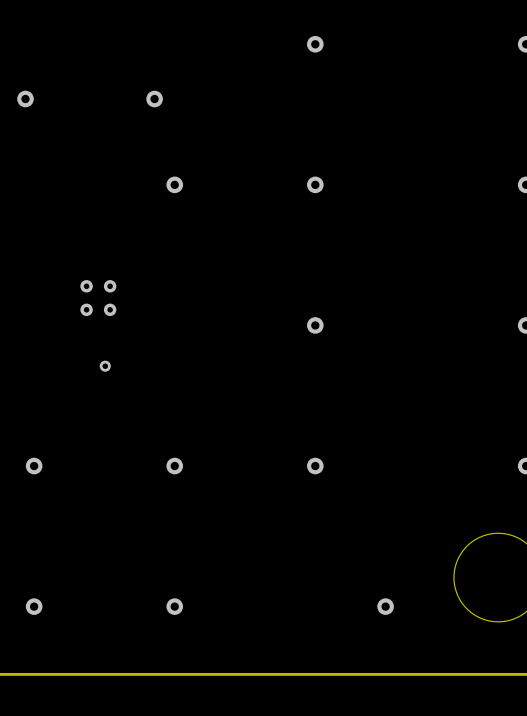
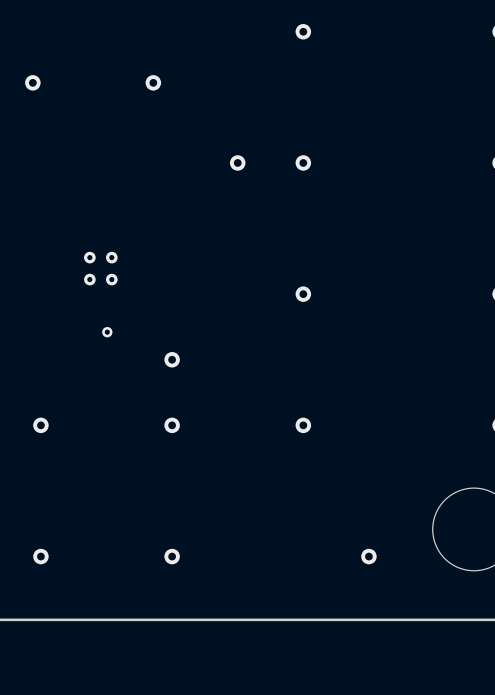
via position: (174, 184) -> (237, 162)
via: none -> (172, 359)

